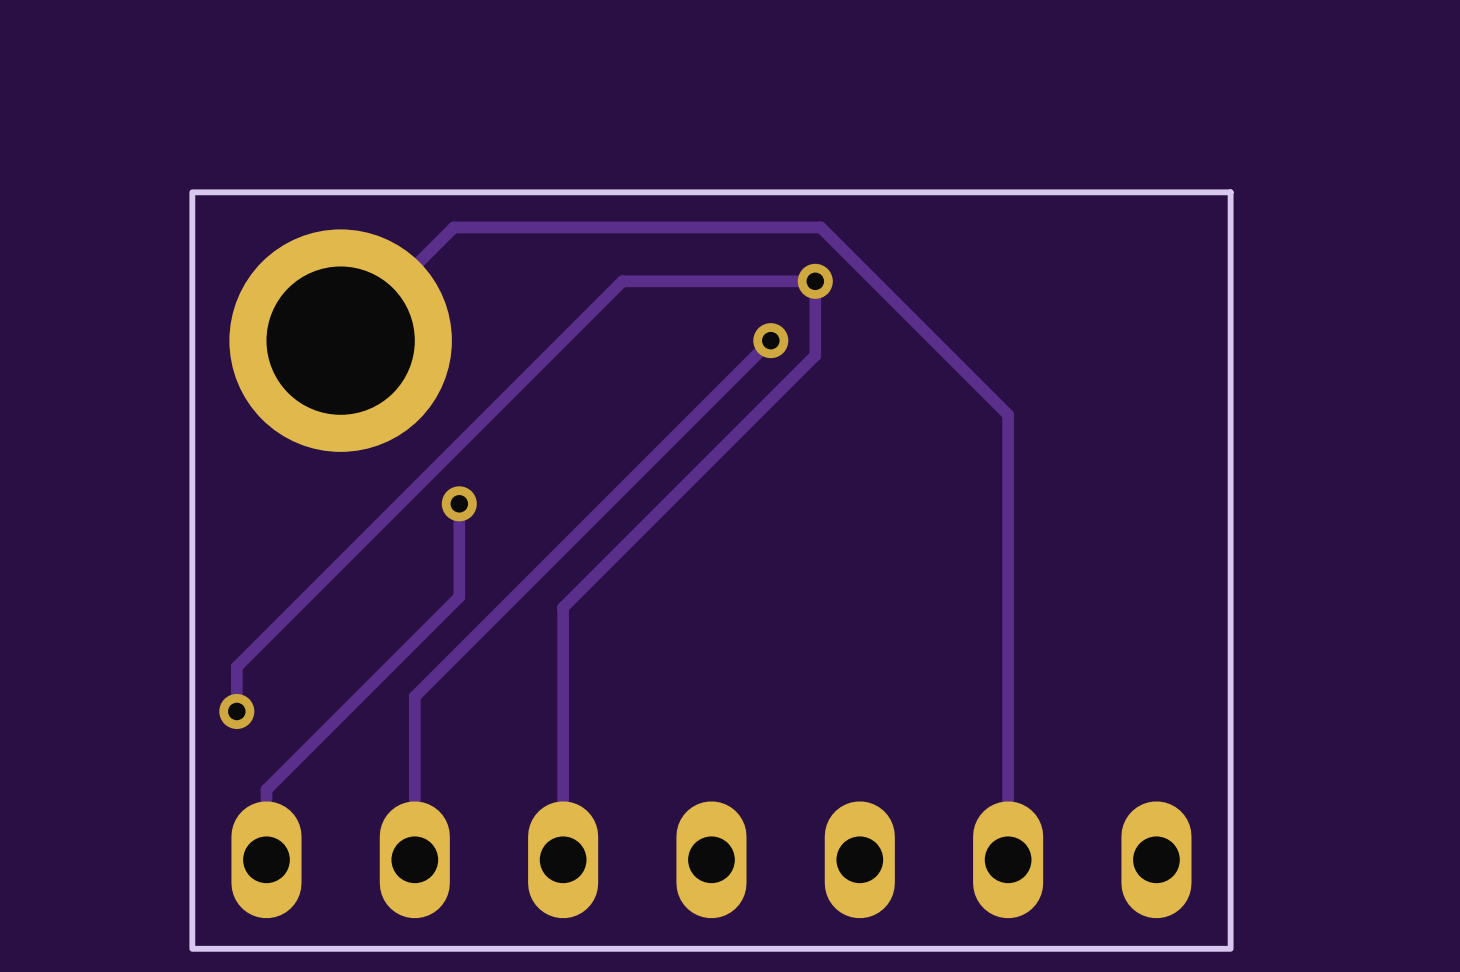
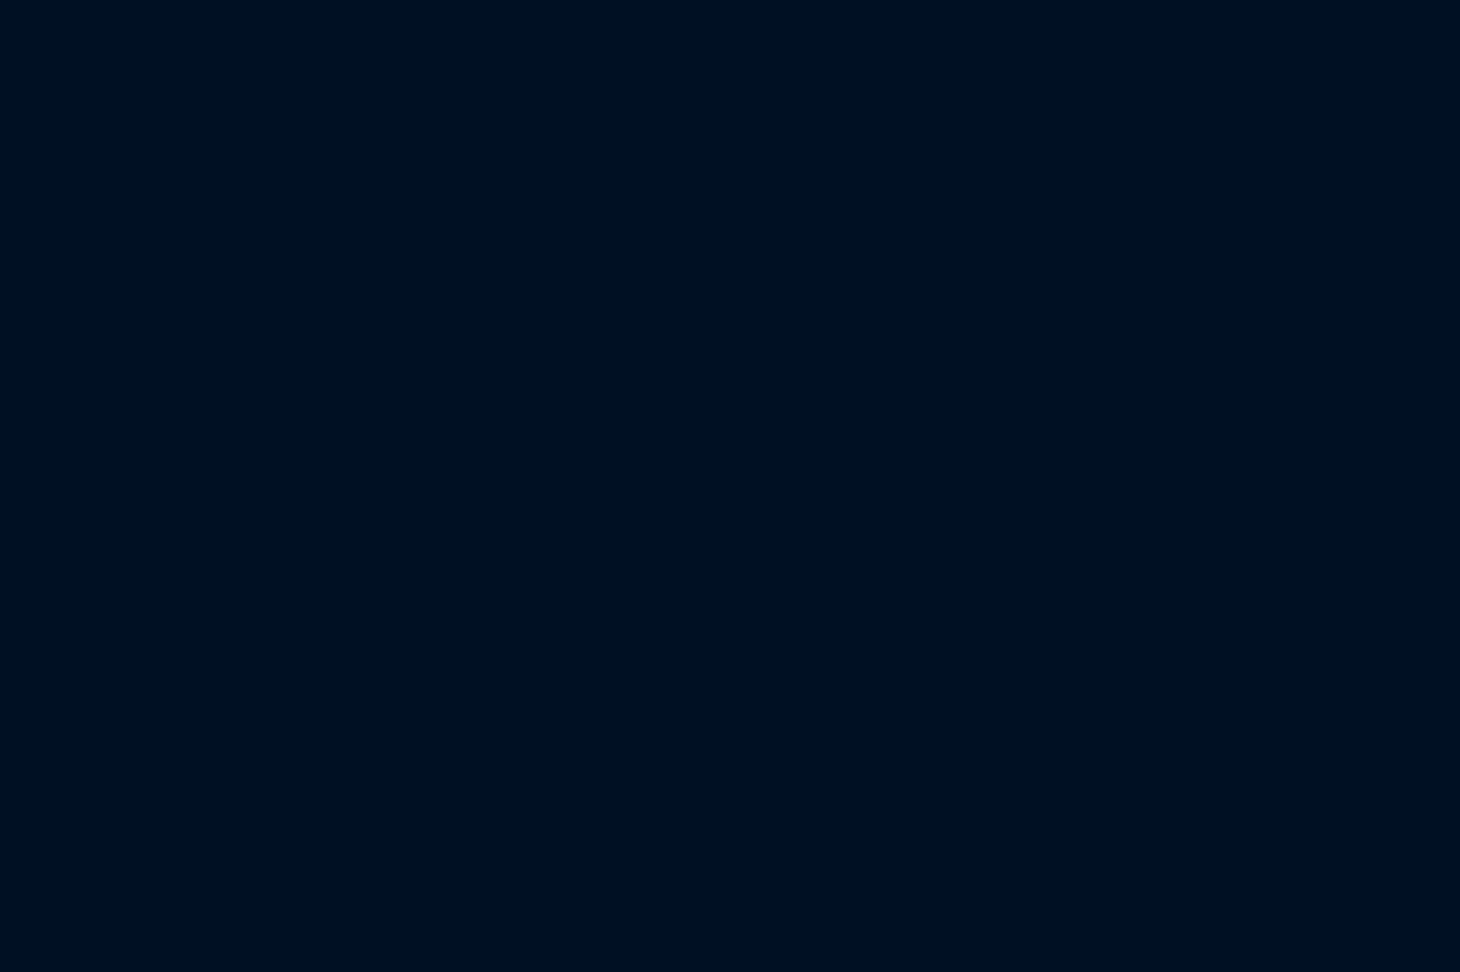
via: (815, 281) -> none
track: (770, 340) (414, 696) (414, 859) -> none
via: (770, 340) -> none
track: (340, 414) (340, 340) (453, 227) (820, 227) (1008, 414) (1008, 859) -> none
track: (459, 503) (459, 596) (266, 789) (266, 859) -> none
via: (459, 503) -> none
part: (711, 570) -> none
track: (236, 711) (236, 666) (622, 281) (815, 281) (815, 355) (563, 607) (563, 859) -> none
via: (236, 711) -> none

